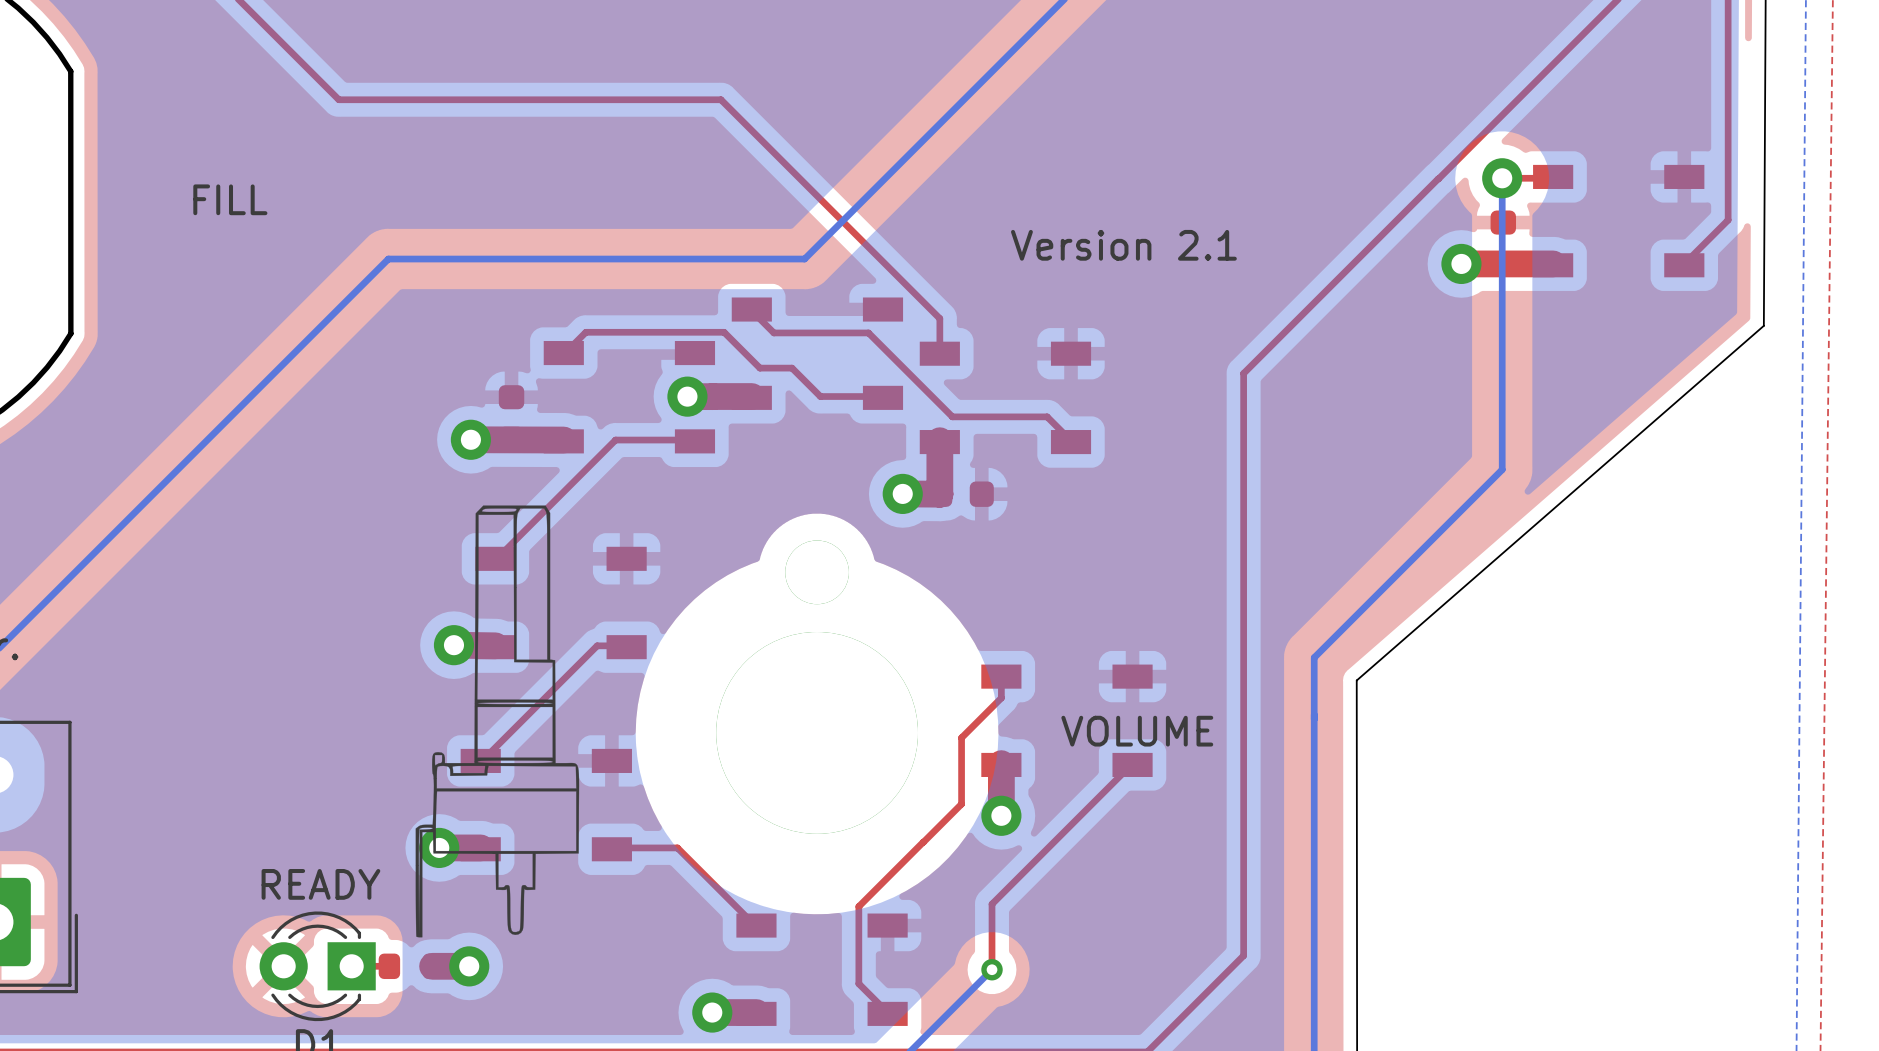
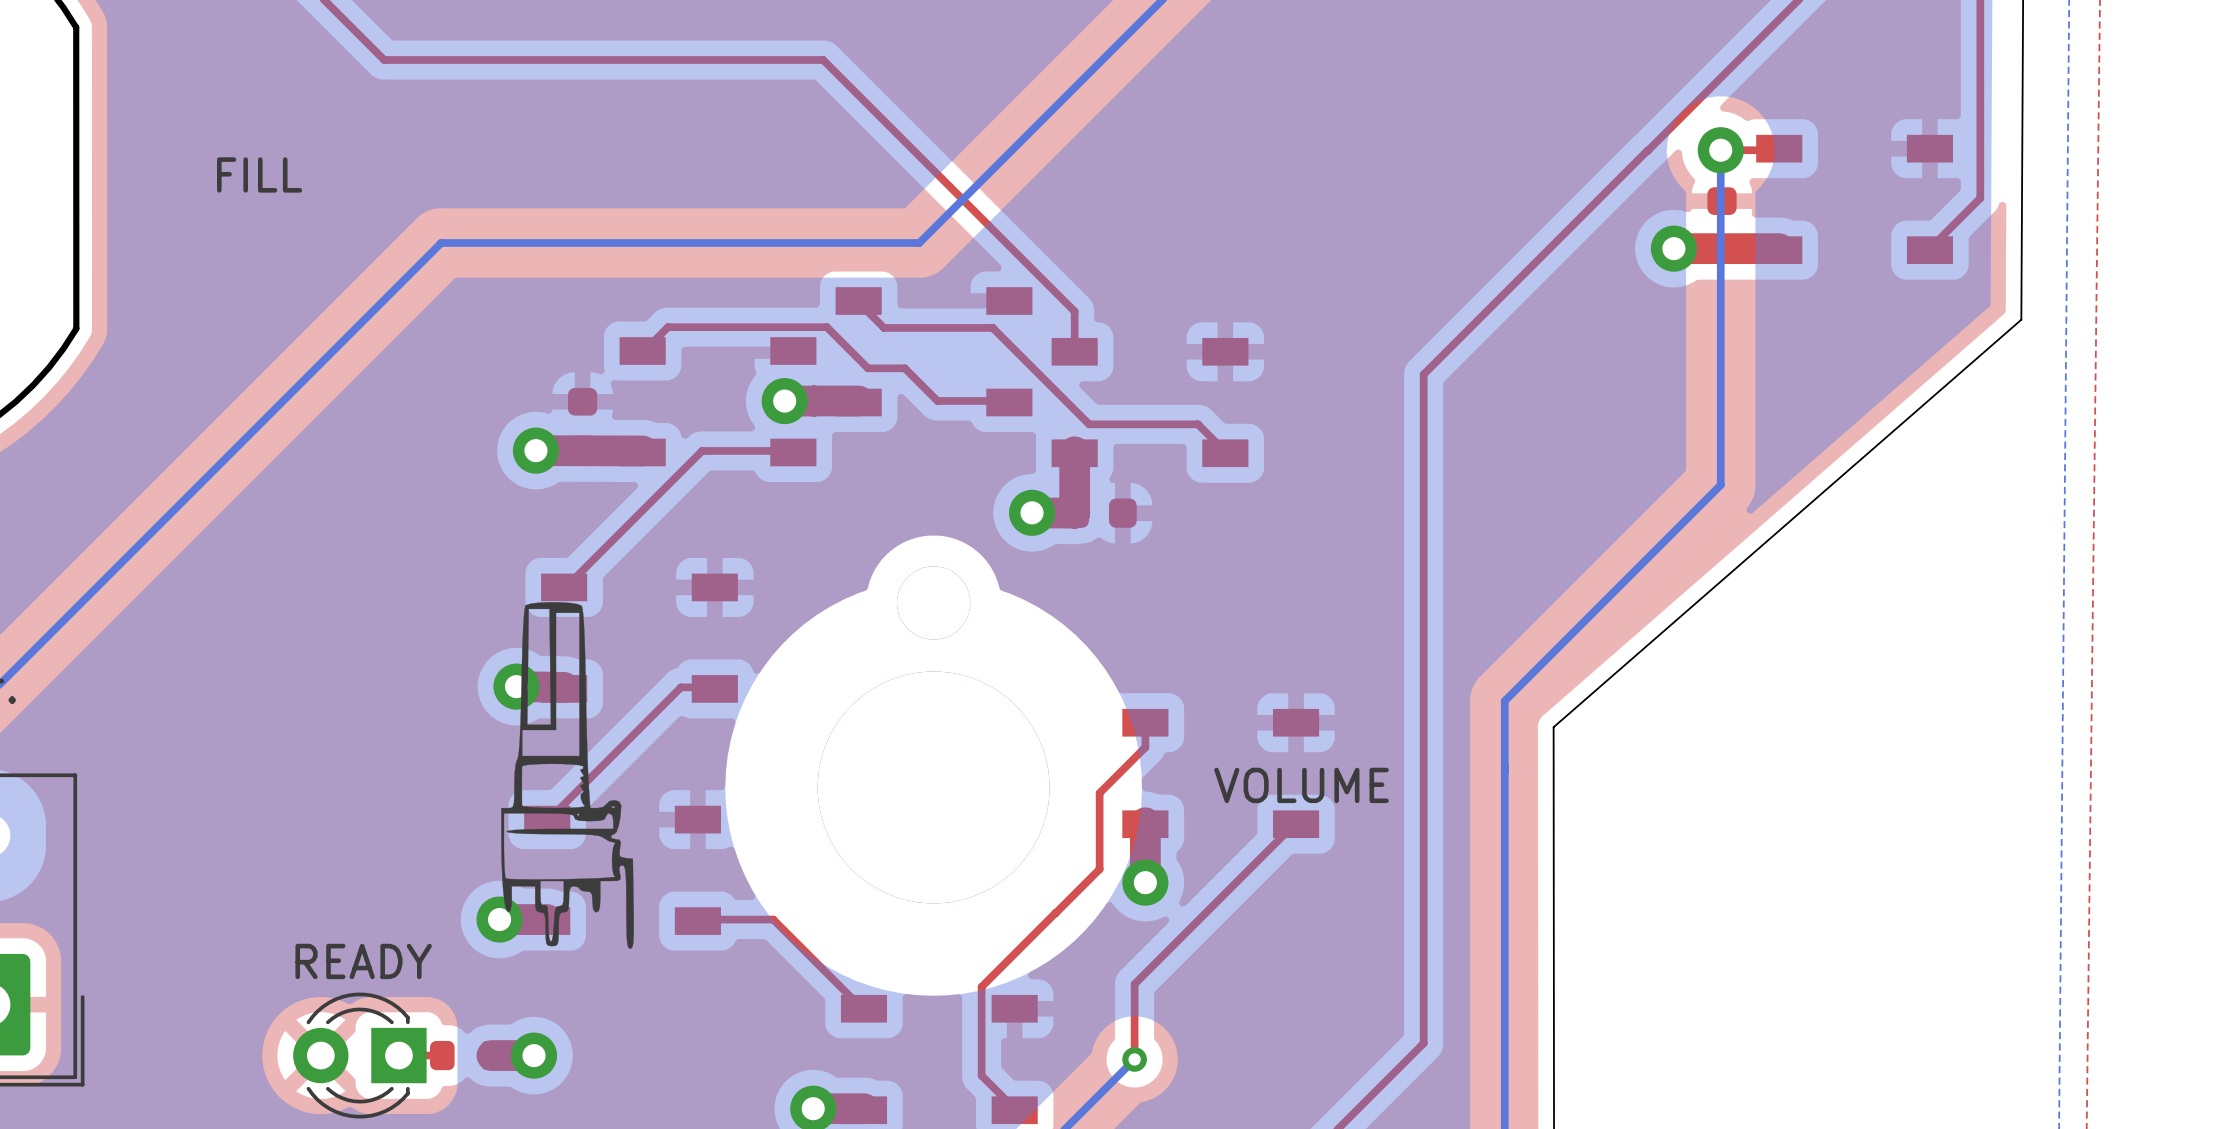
text: Version 2.1 (1123, 245) -> none
drawing shape: [415, 505, 580, 938] -> [501, 602, 634, 949]

